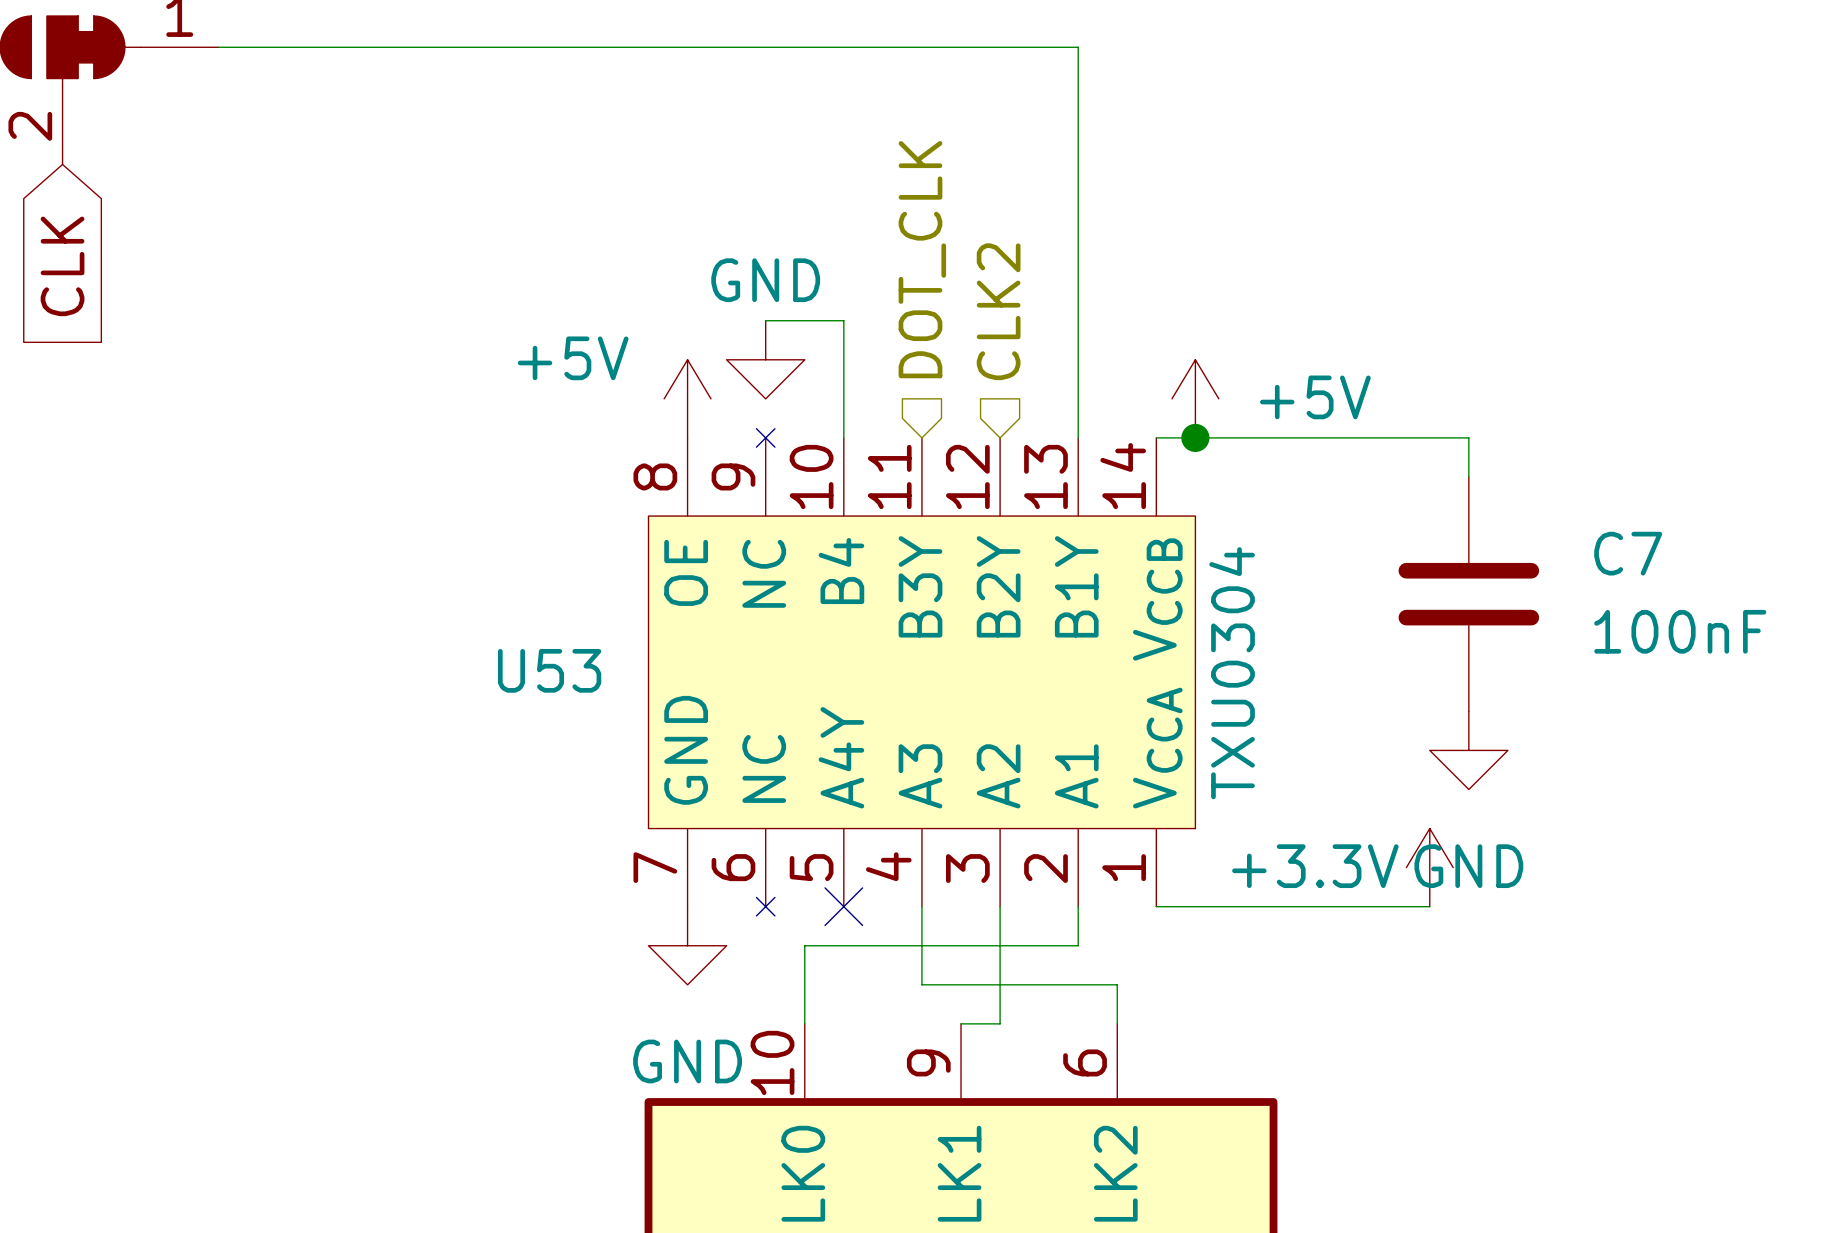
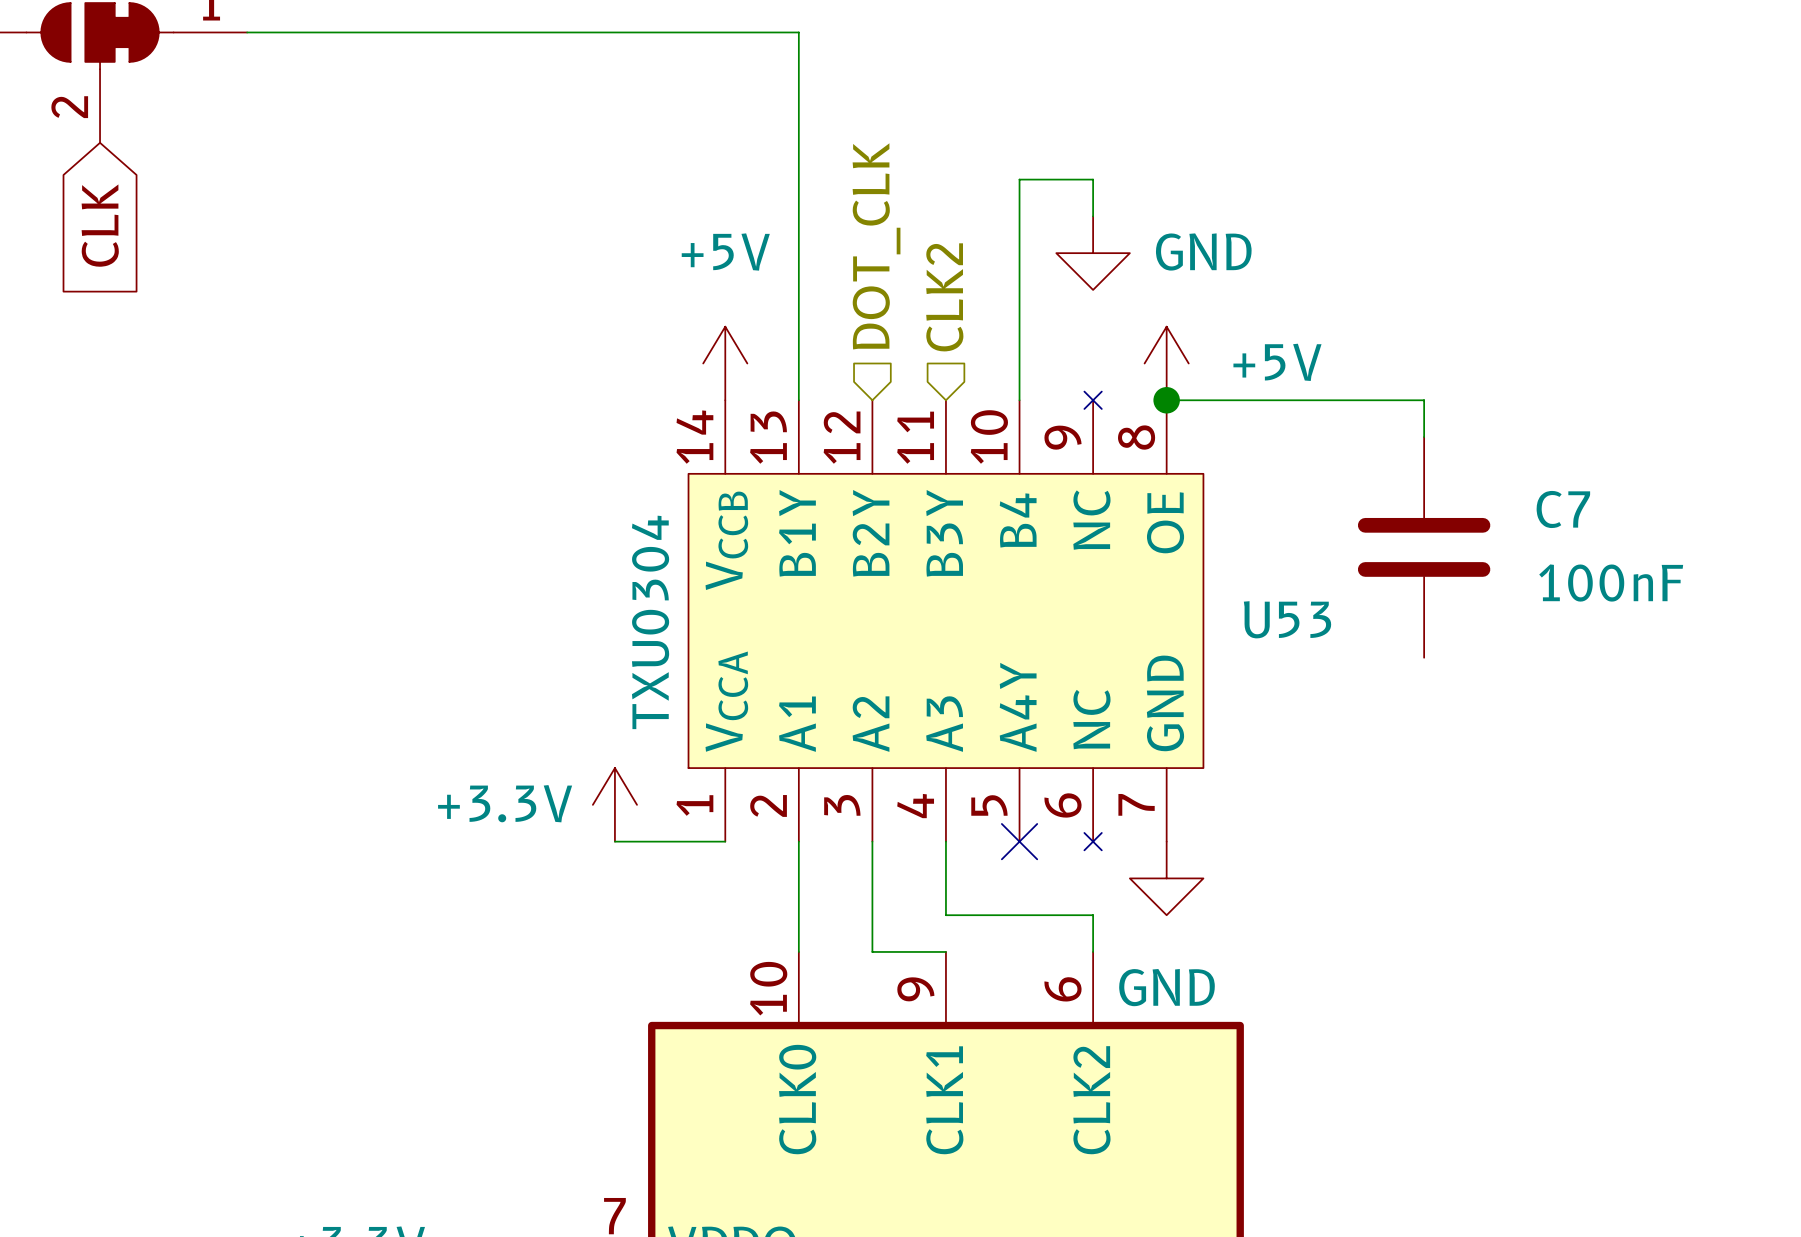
wire: (804, 47) (1078, 47) (1078, 437) -> (798, 32) (798, 400)
wire: none -> (1093, 216) (1093, 179) (1019, 179) (1019, 400)
hierarchical label position: DOT_CLK (922, 259) -> DOT_CLK (876, 246)
power symbol: none -> GND (1093, 253)
hierarchical label position: CLK2 (998, 311) -> CLK2 (944, 297)
wire: (765, 320) (843, 320) (843, 437) -> none
power symbol text position: +5V (573, 358) -> +5V (725, 252)
power symbol: GND (765, 359) -> none
power symbol position: +5V (687, 398) -> +5V (725, 363)
wire: (1156, 437) (1195, 437) -> none
U53 flip: as is (921, 672) -> left-right (945, 620)
power symbol: GND (1468, 750) -> none
power symbol: none -> +3.3V (614, 804)
power symbol: +3.3V (1429, 867) -> none
wire: none -> (614, 841) (725, 841)
no-connect mark: (843, 906) -> none
wire: (921, 906) (921, 984) (961, 984) -> (945, 841) (945, 915)
wire: (1000, 906) (1000, 1023) (961, 1023) -> (872, 841) (872, 951) (945, 951)
no-connect mark: none -> (1019, 841)
wire: (1078, 906) (1078, 945) (804, 945) -> (798, 841) (798, 878)
wire: (1156, 906) (1429, 906) -> none
power symbol: GND (687, 945) -> none
power symbol: none -> GND (1166, 878)

